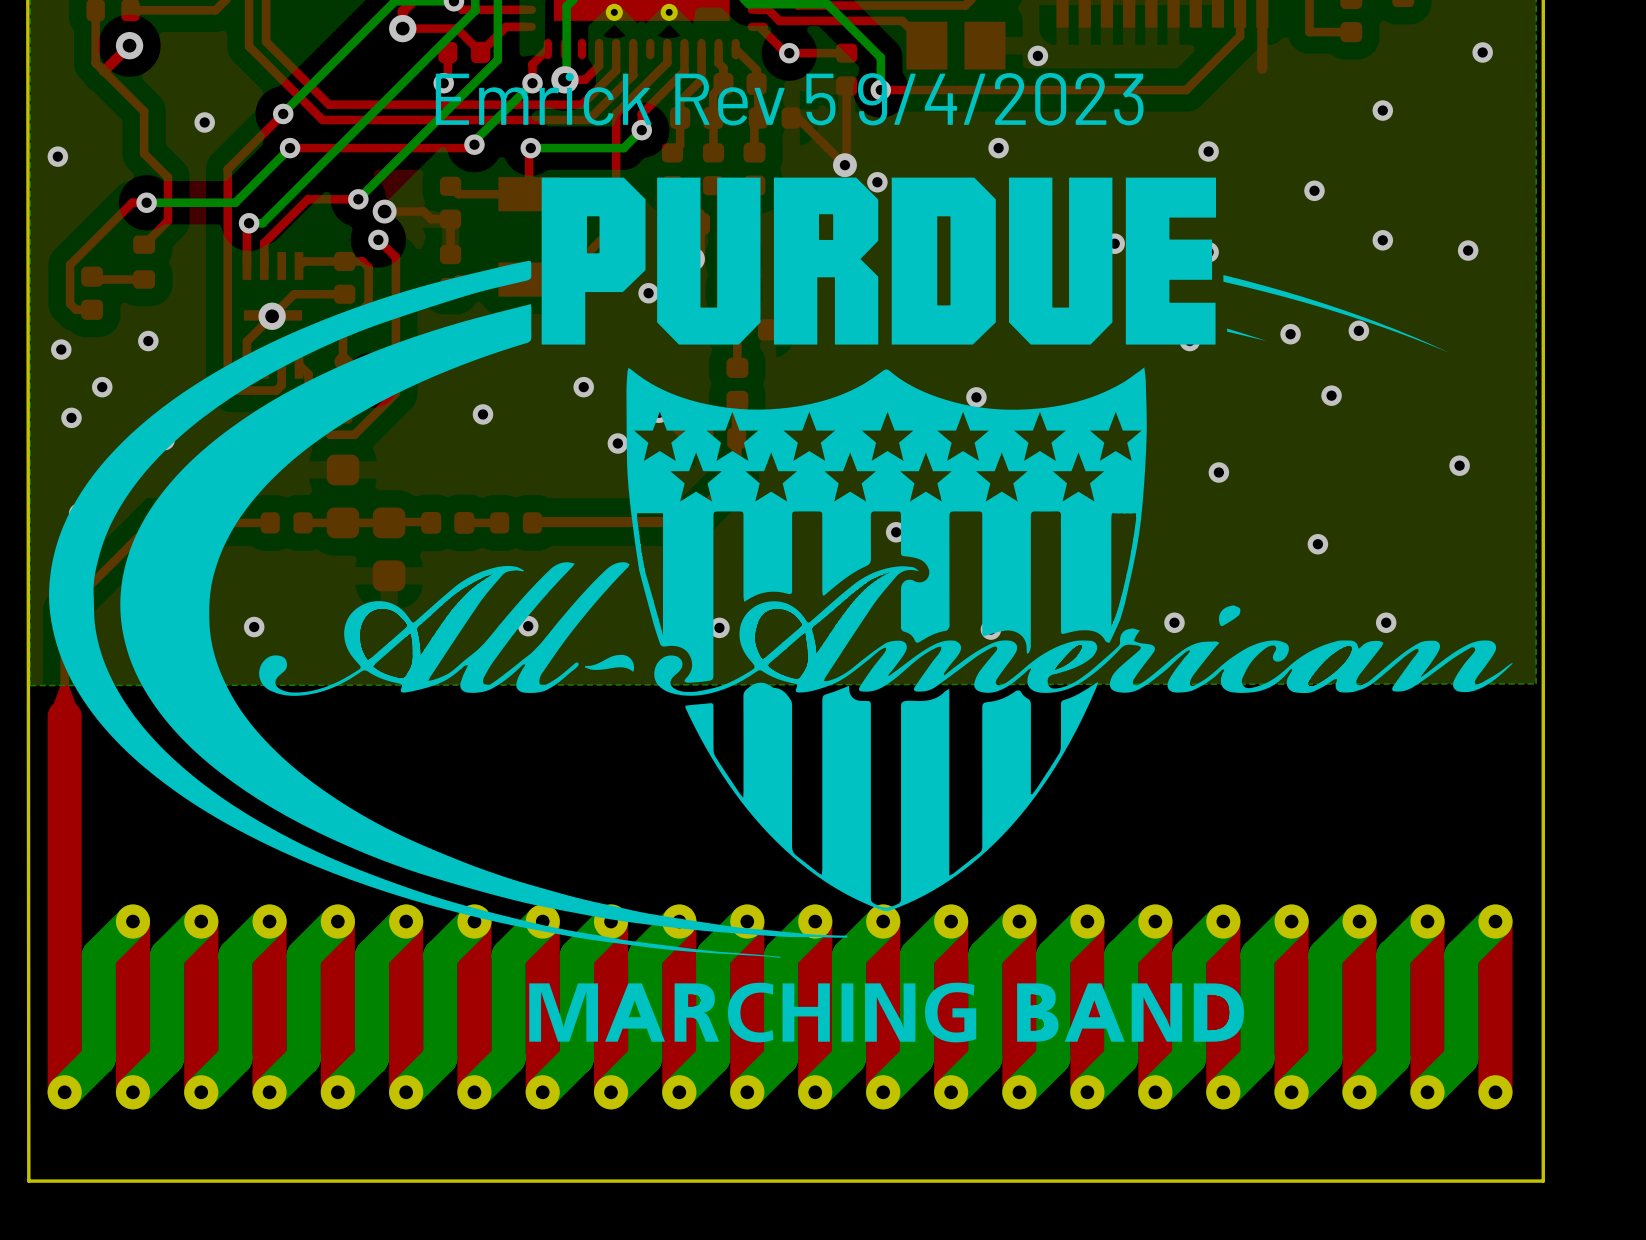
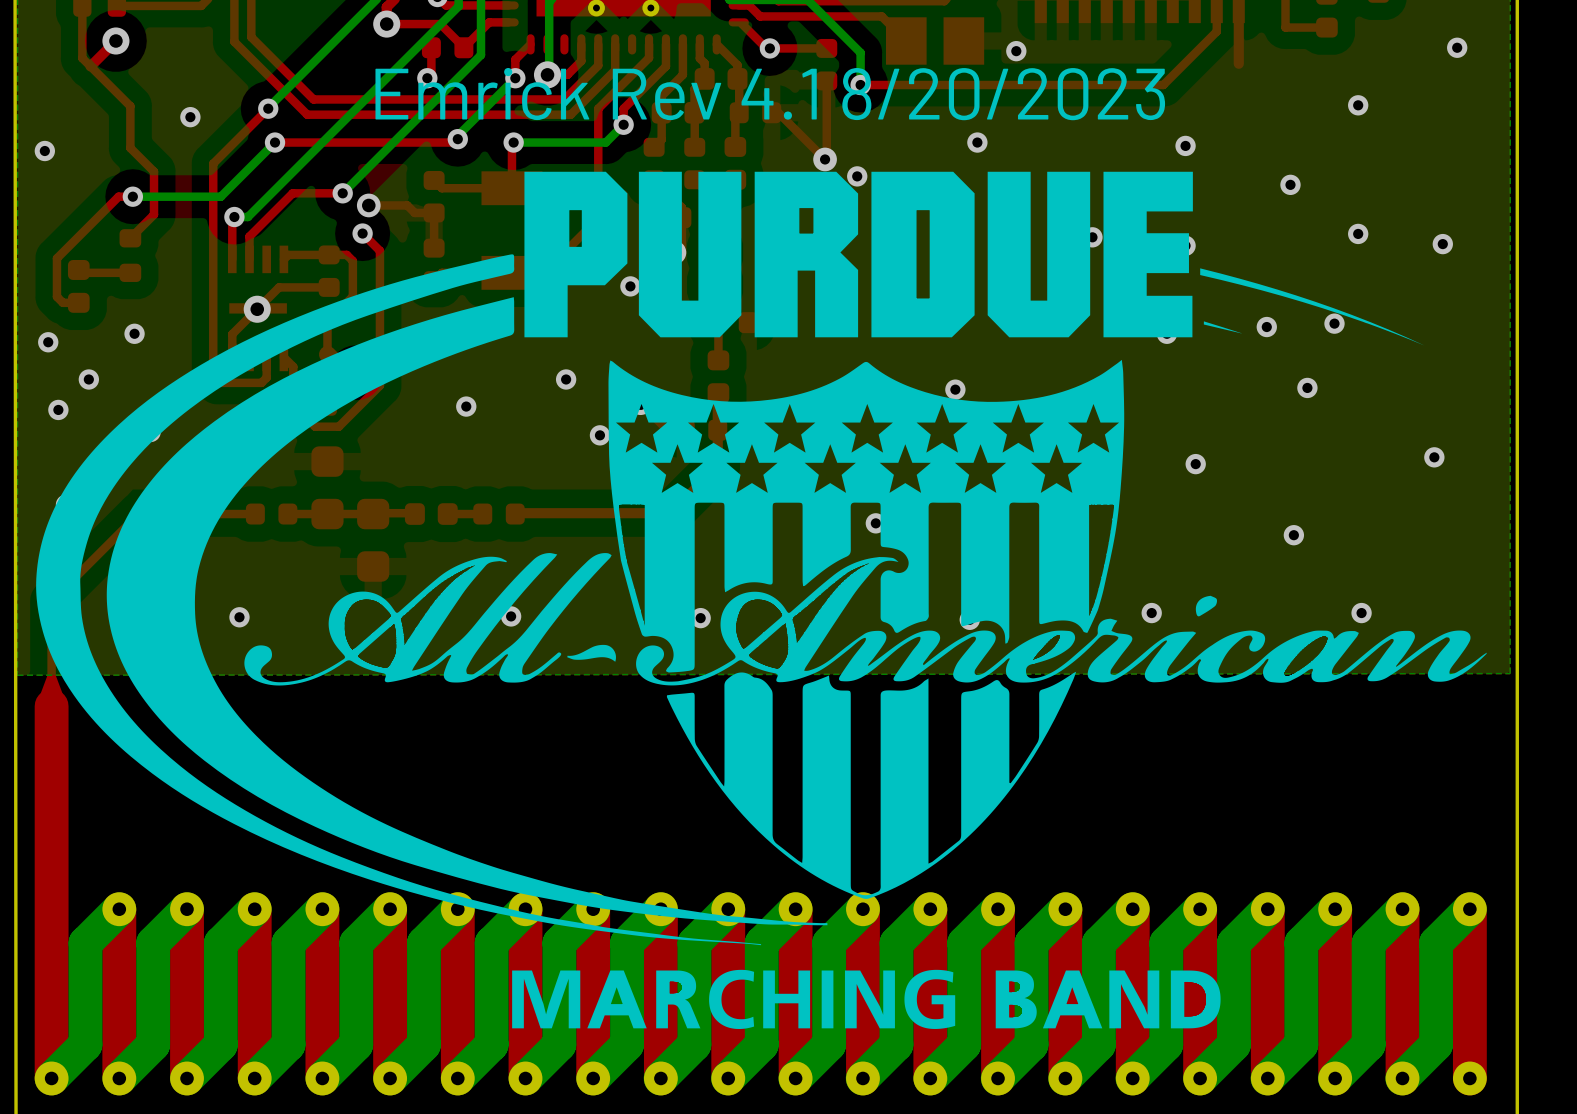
text: Emrick Rev 5 9/4/2023 (789, 99) -> Emrick Rev 4.1 8/20/2023 (770, 94)

